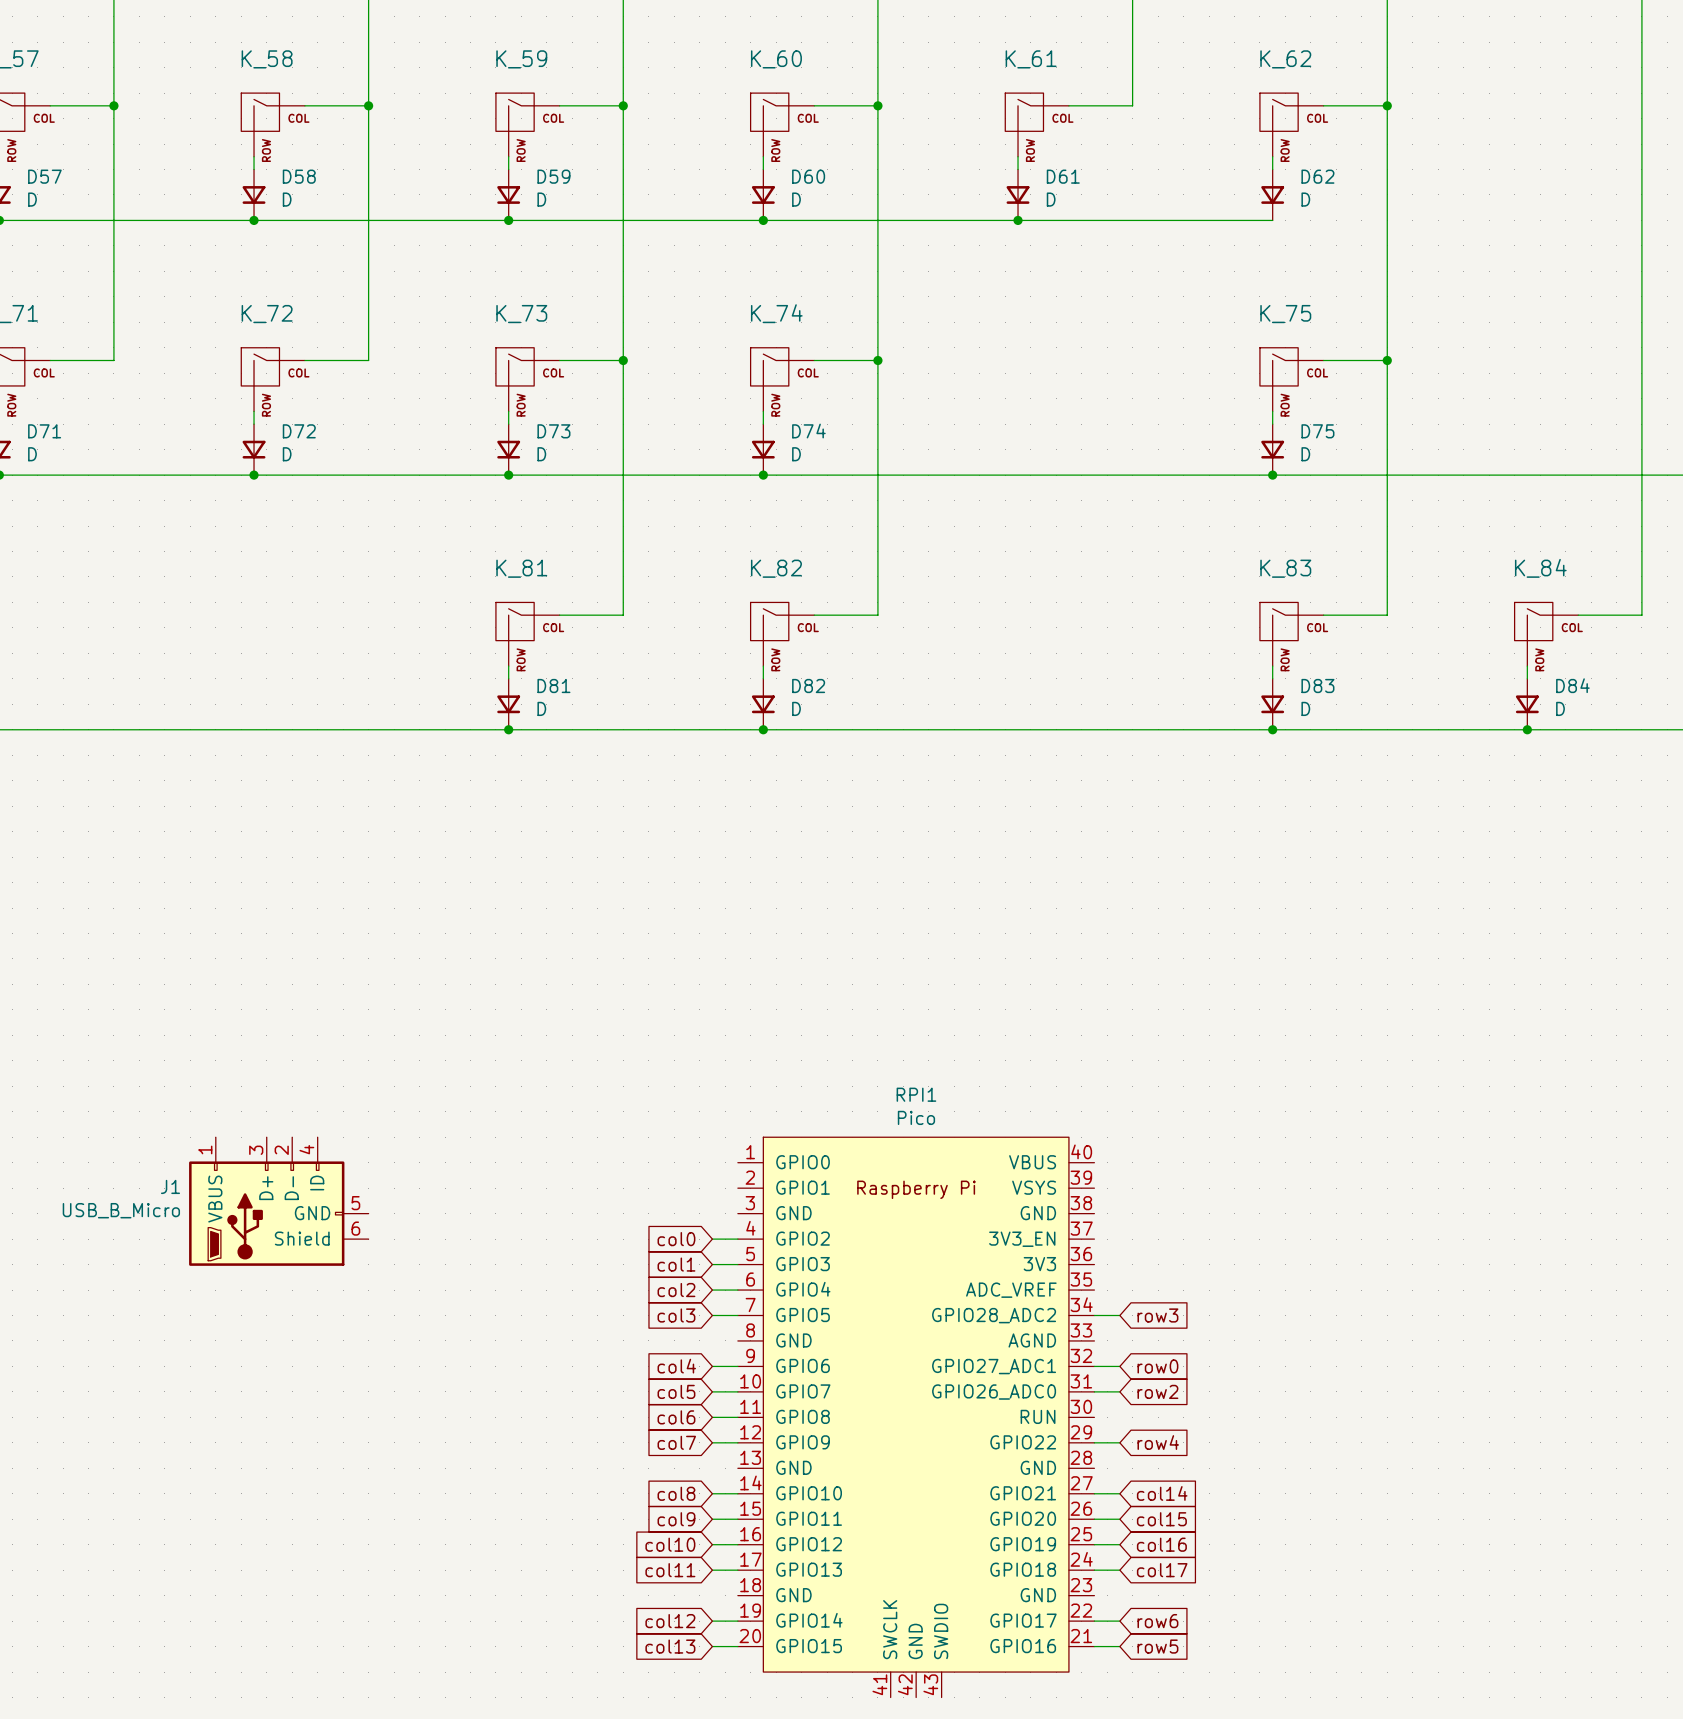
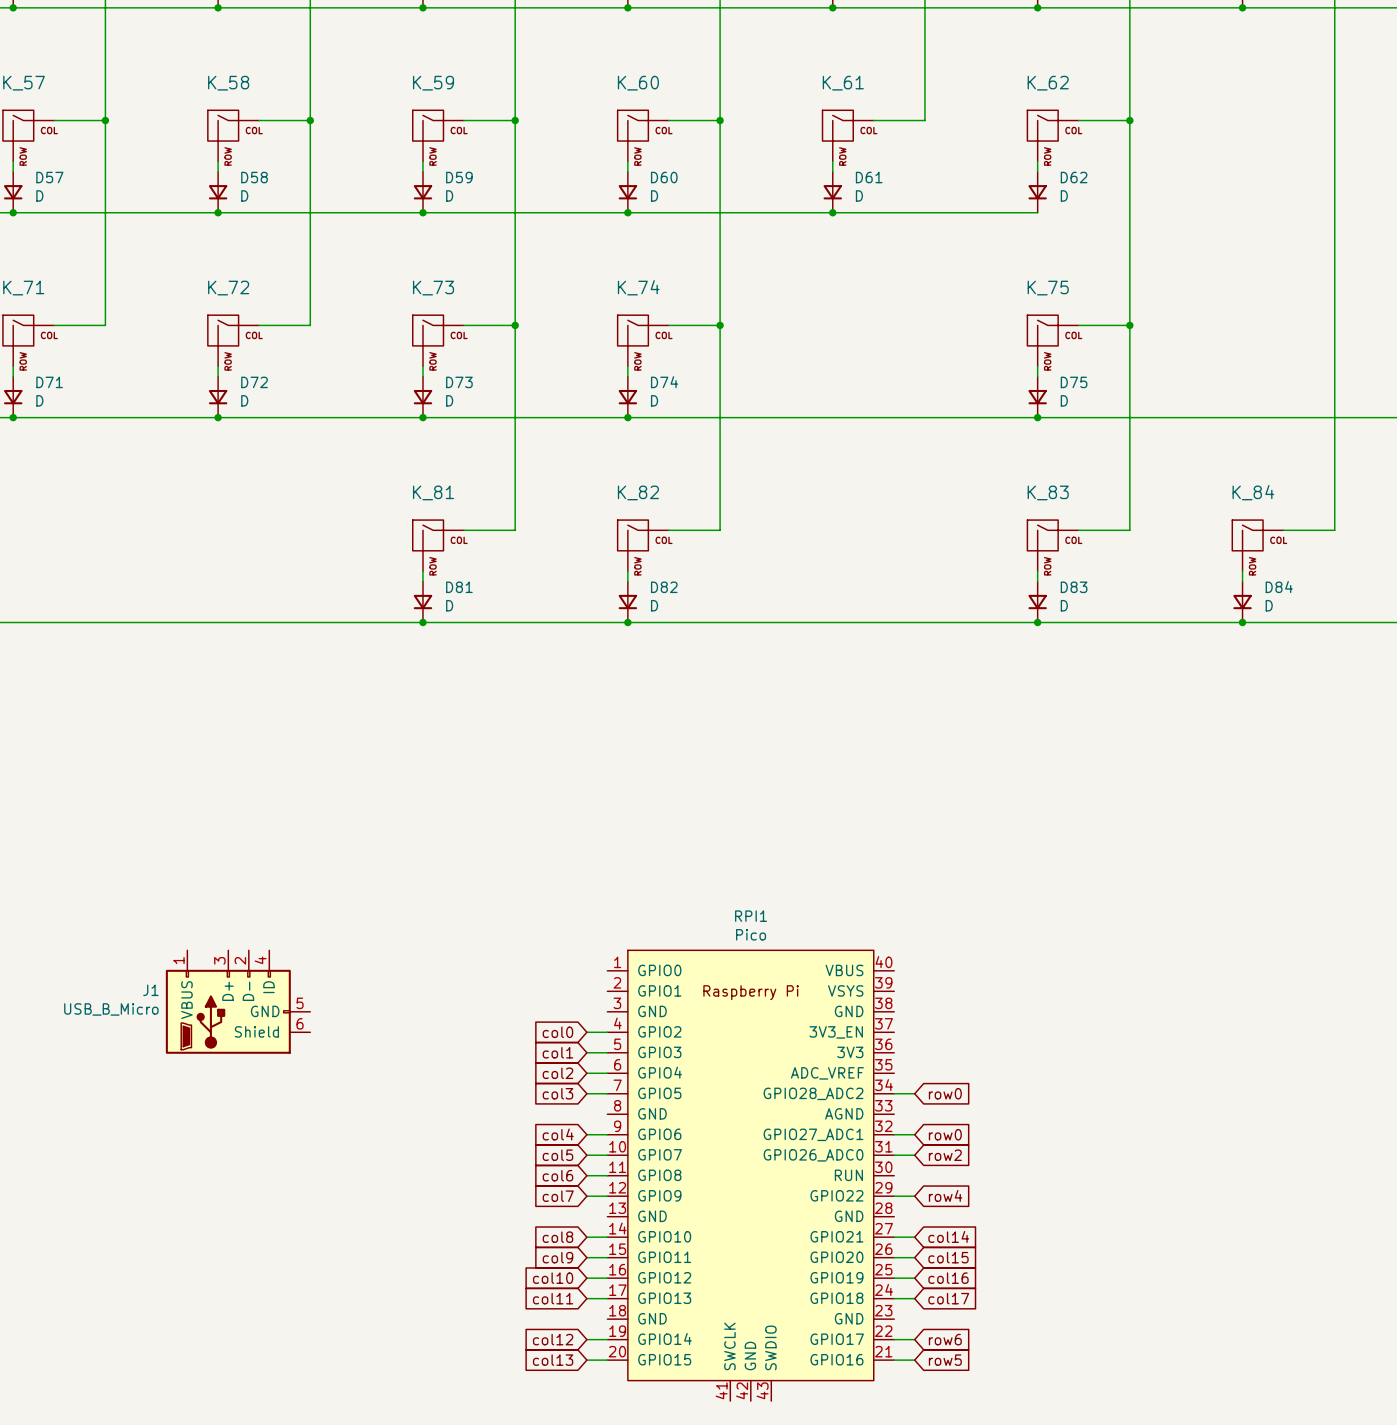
global label: row3 (1157, 1315) -> row0 (945, 1093)

